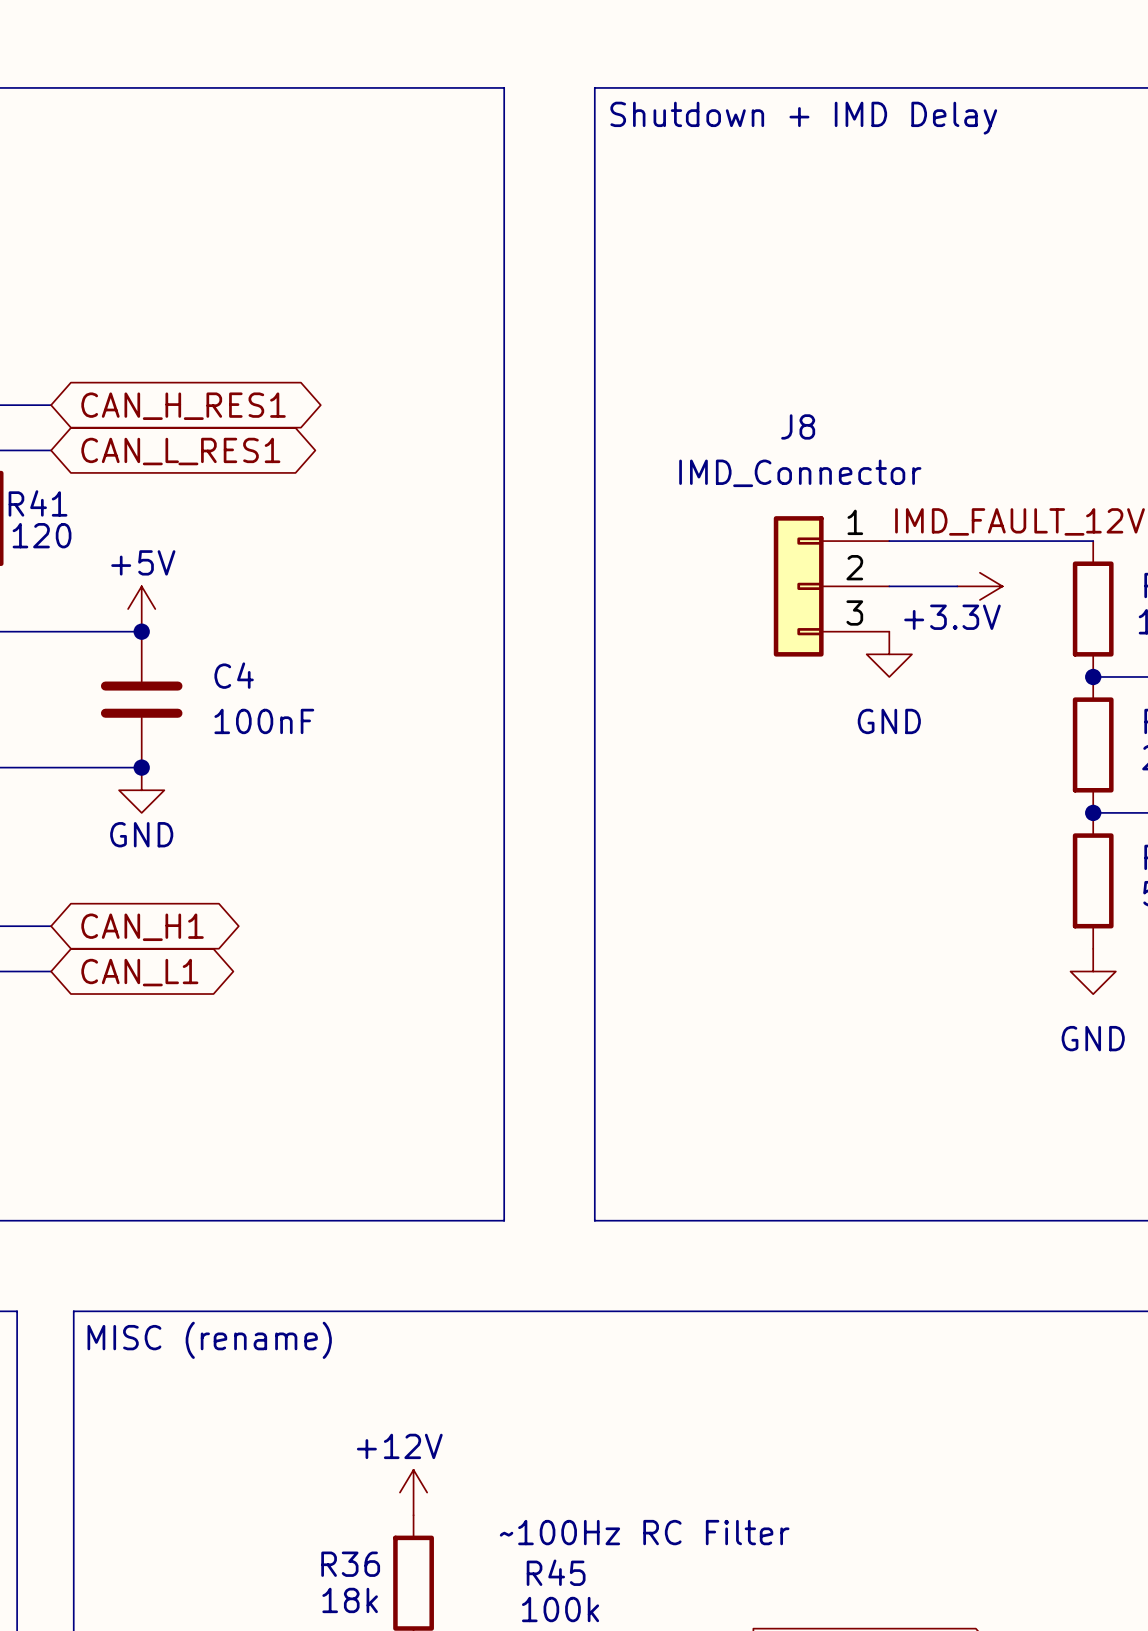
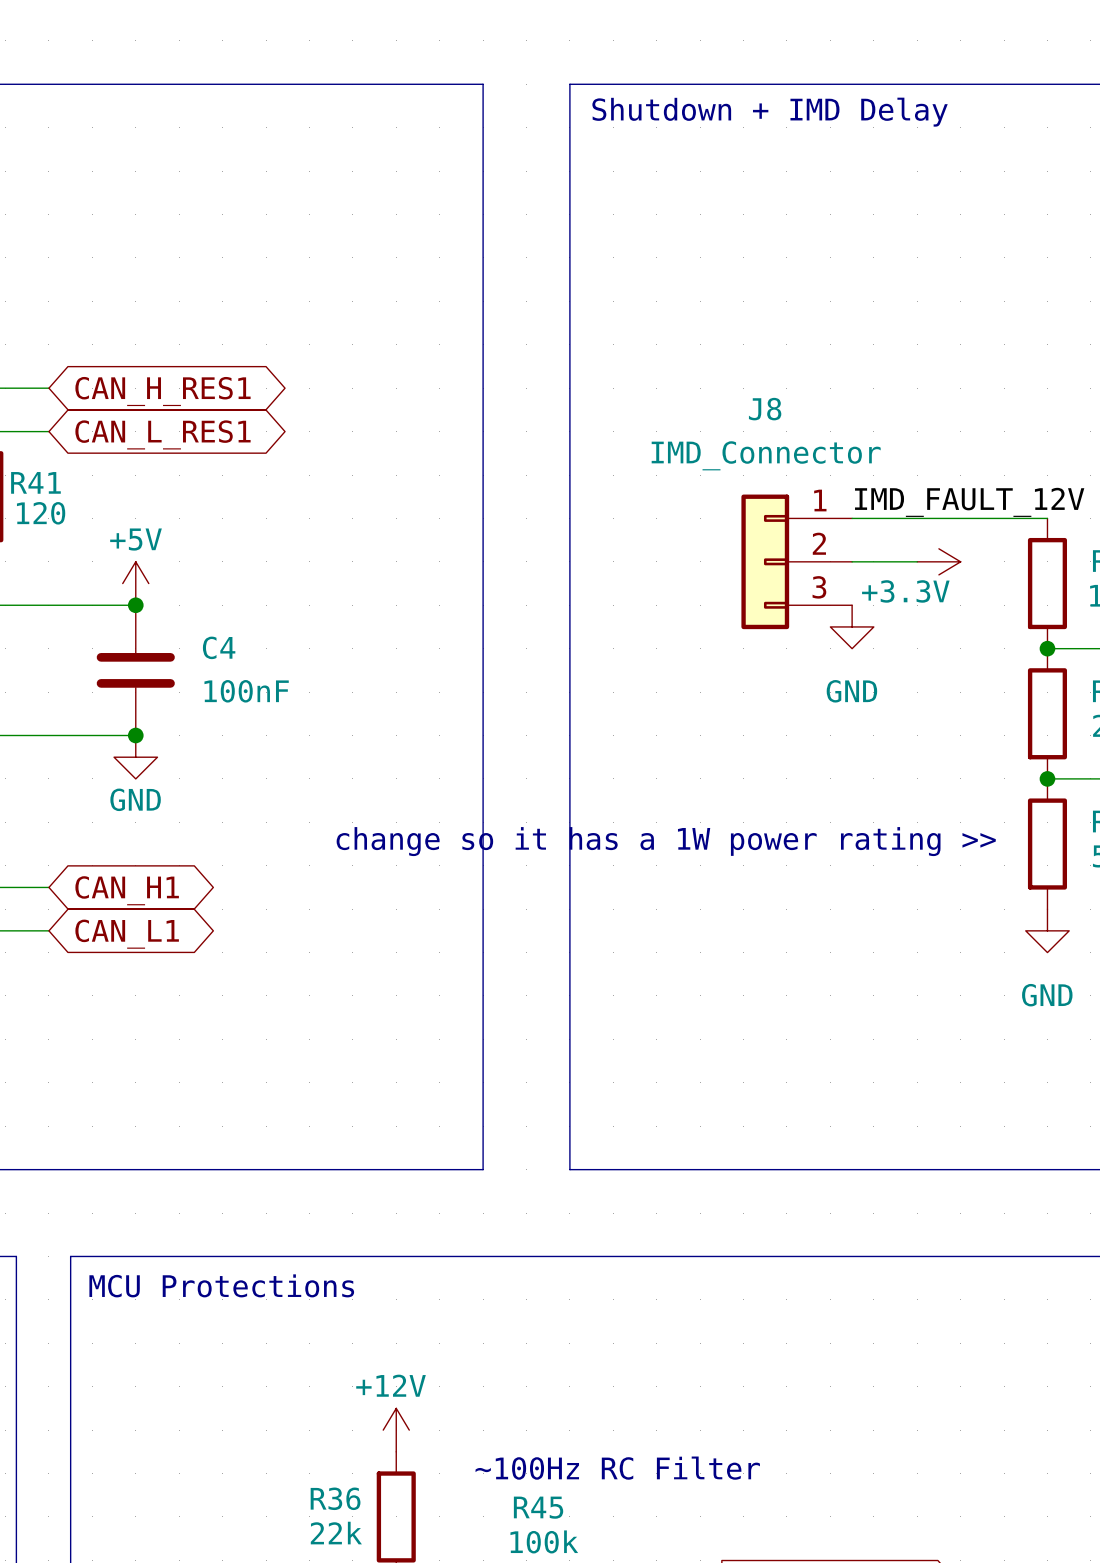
text: none -> change so it has a 1W power rating >> (666, 841)
text: MISC (rename) (209, 1340) -> none
text: none -> MCU Protections (221, 1285)
R36 value: 18k (350, 1600) -> 22k (336, 1533)

